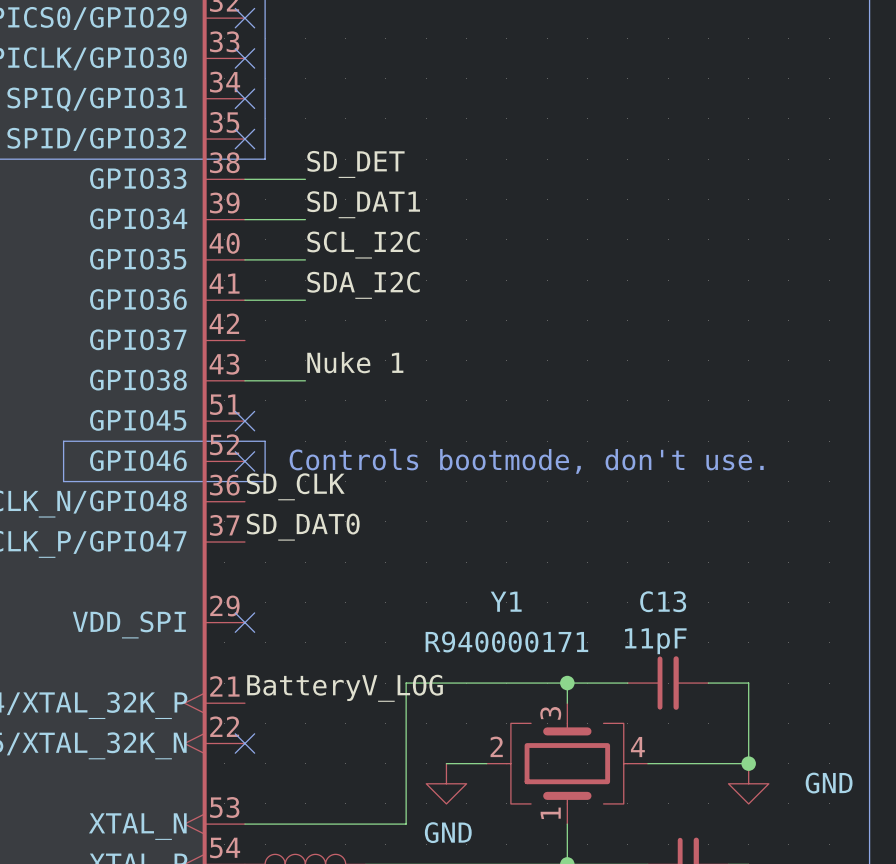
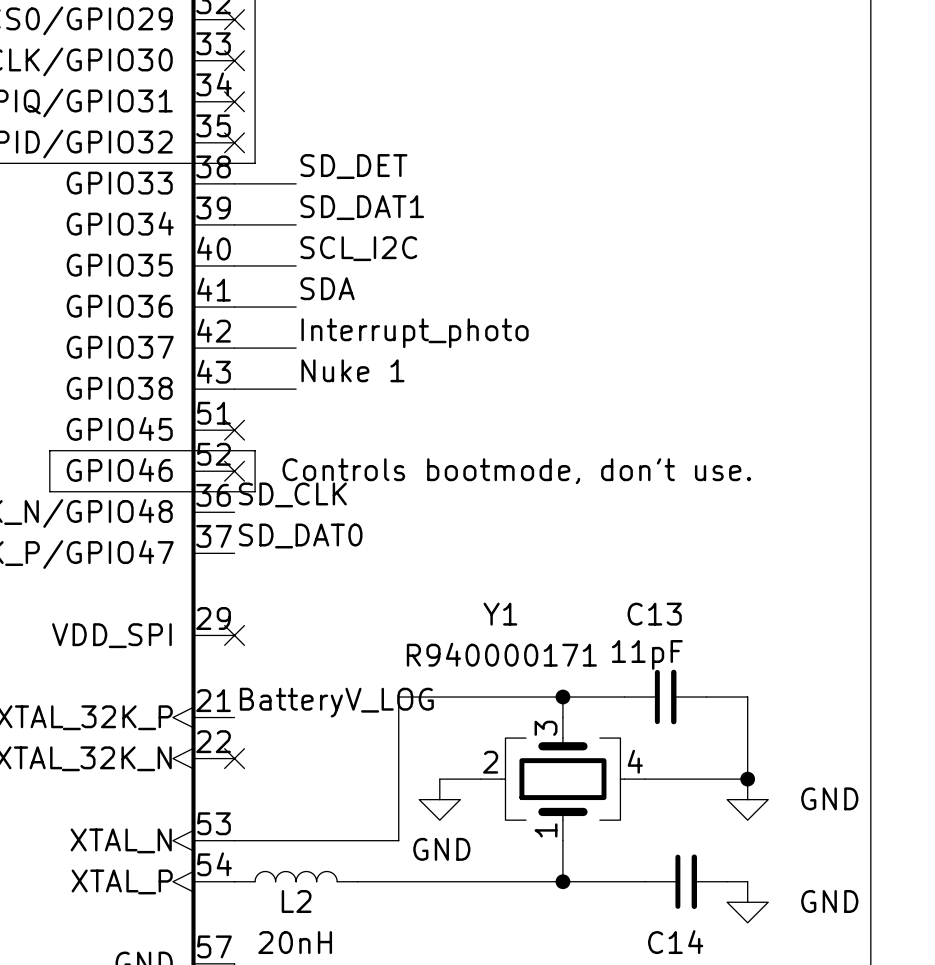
label: SDA_I2C (363, 285) -> SDA (327, 288)
label: none -> Interrupt_photo (415, 333)
wire: none -> (234, 348) (296, 348)

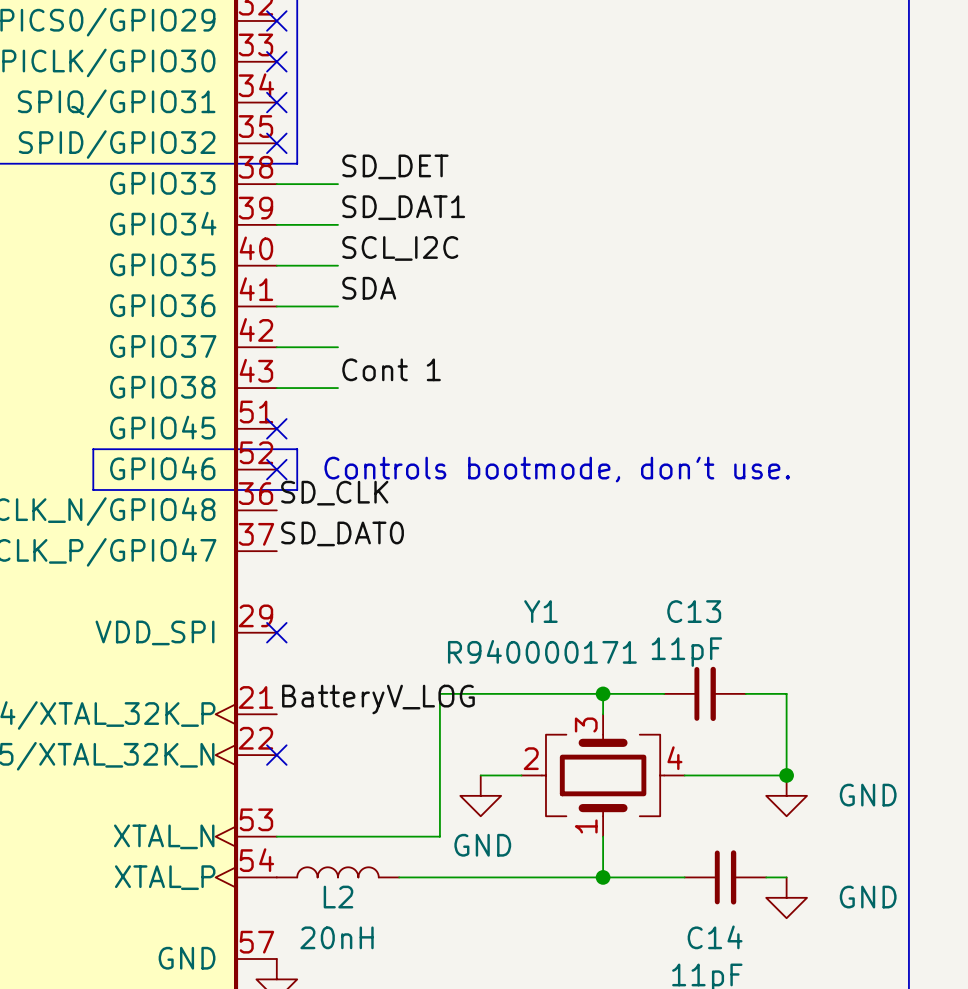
label: Interrupt_photo (415, 333) -> none
label: Nuke 1 (352, 370) -> Cont 1 (391, 369)

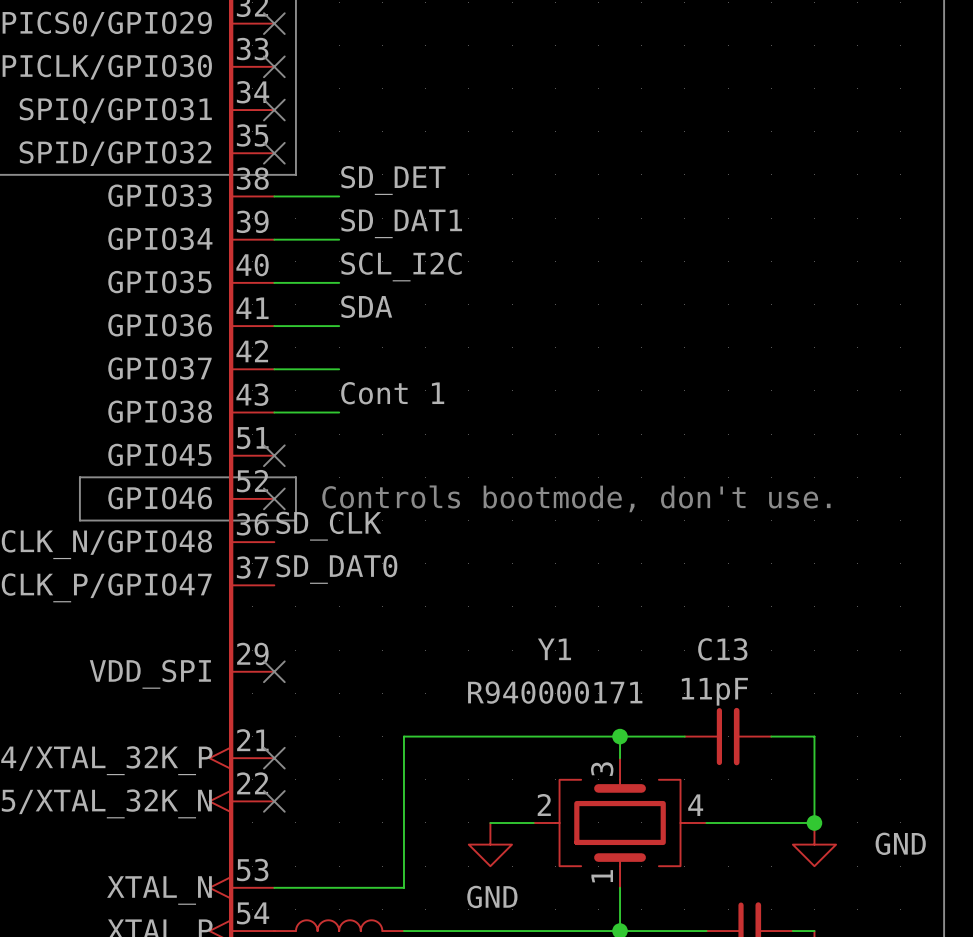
wire: (439, 693) (439, 836) (399, 836) -> (447, 736) (403, 736) (403, 887)
label: BatteryV_LOG (378, 699) -> none
no-connect mark: none -> (274, 758)

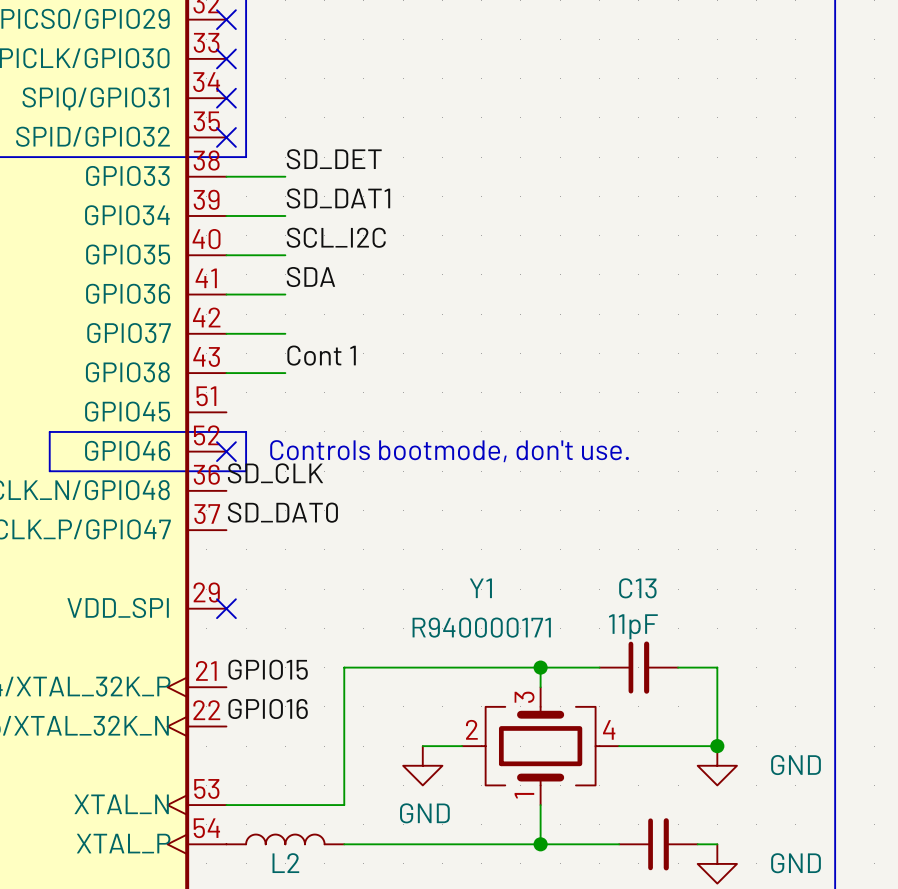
no-connect mark: (274, 455) -> none
label: none -> GPIO15 (268, 669)
no-connect mark: (274, 758) -> none
label: none -> GPIO16 (268, 708)
no-connect mark: (274, 801) -> none

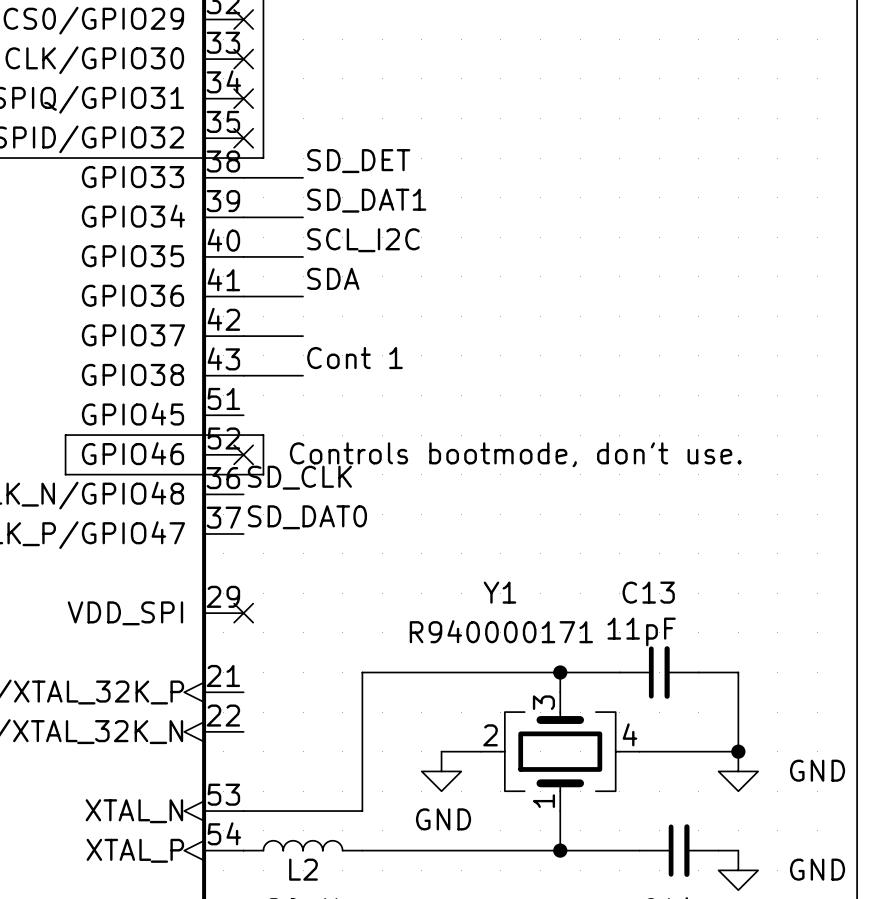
label: GPIO15 (268, 669) -> none
label: GPIO16 (268, 708) -> none

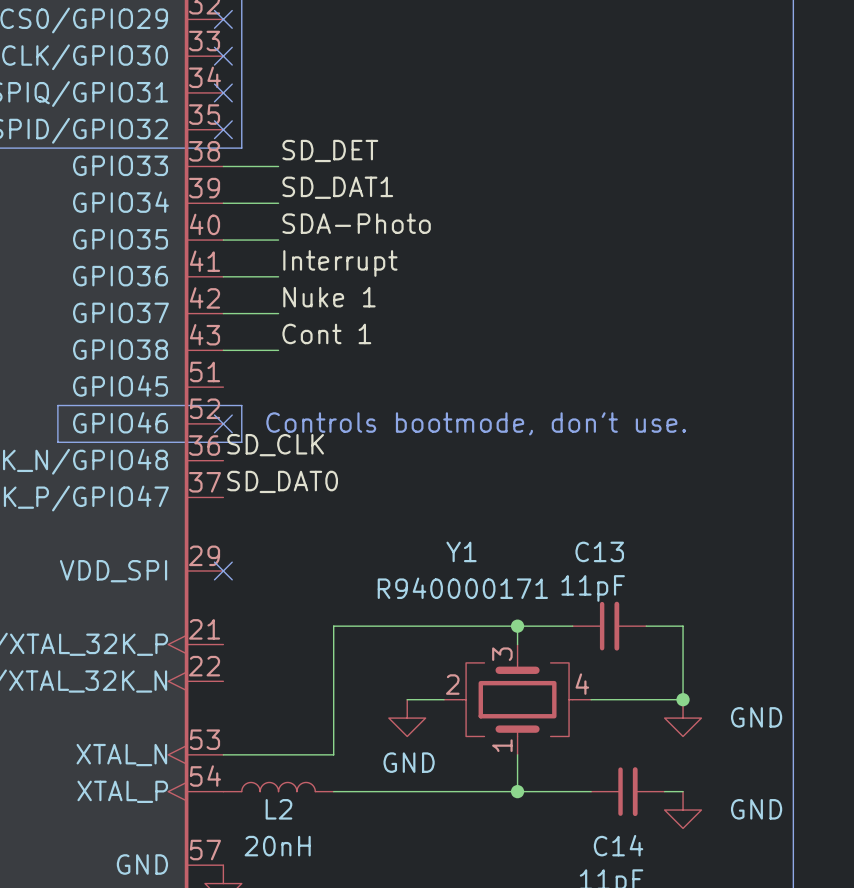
label: SCL_I2C (363, 240) -> SDA-Photo (356, 223)
label: SDA (333, 278) -> Interrupt (340, 263)
label: none -> Nuke 1 (329, 297)

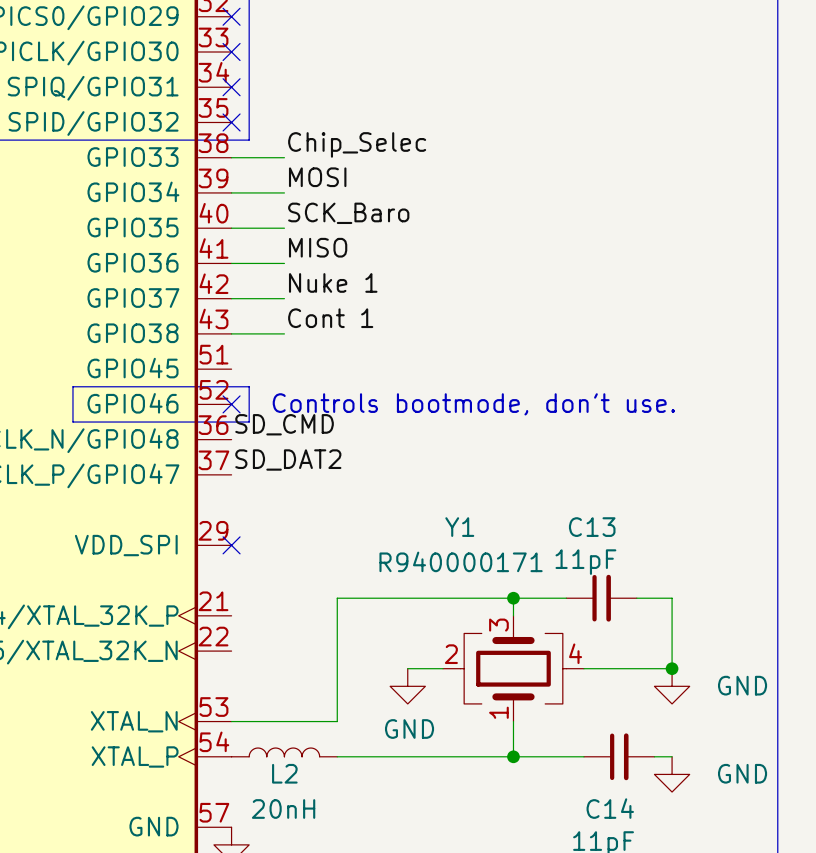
label: SD_DET (330, 150) -> Chip_Selec (357, 144)
label: SD_DAT1 (337, 187) -> MOSI (317, 177)
label: SDA-Photo (356, 223) -> SCK_Baro (348, 213)
label: Interrupt (340, 263) -> MISO (318, 247)
label: SD_CLK (275, 445) -> SD_CMD (284, 424)
label: SD_DAT0 (282, 481) -> SD_DAT2 (288, 459)

